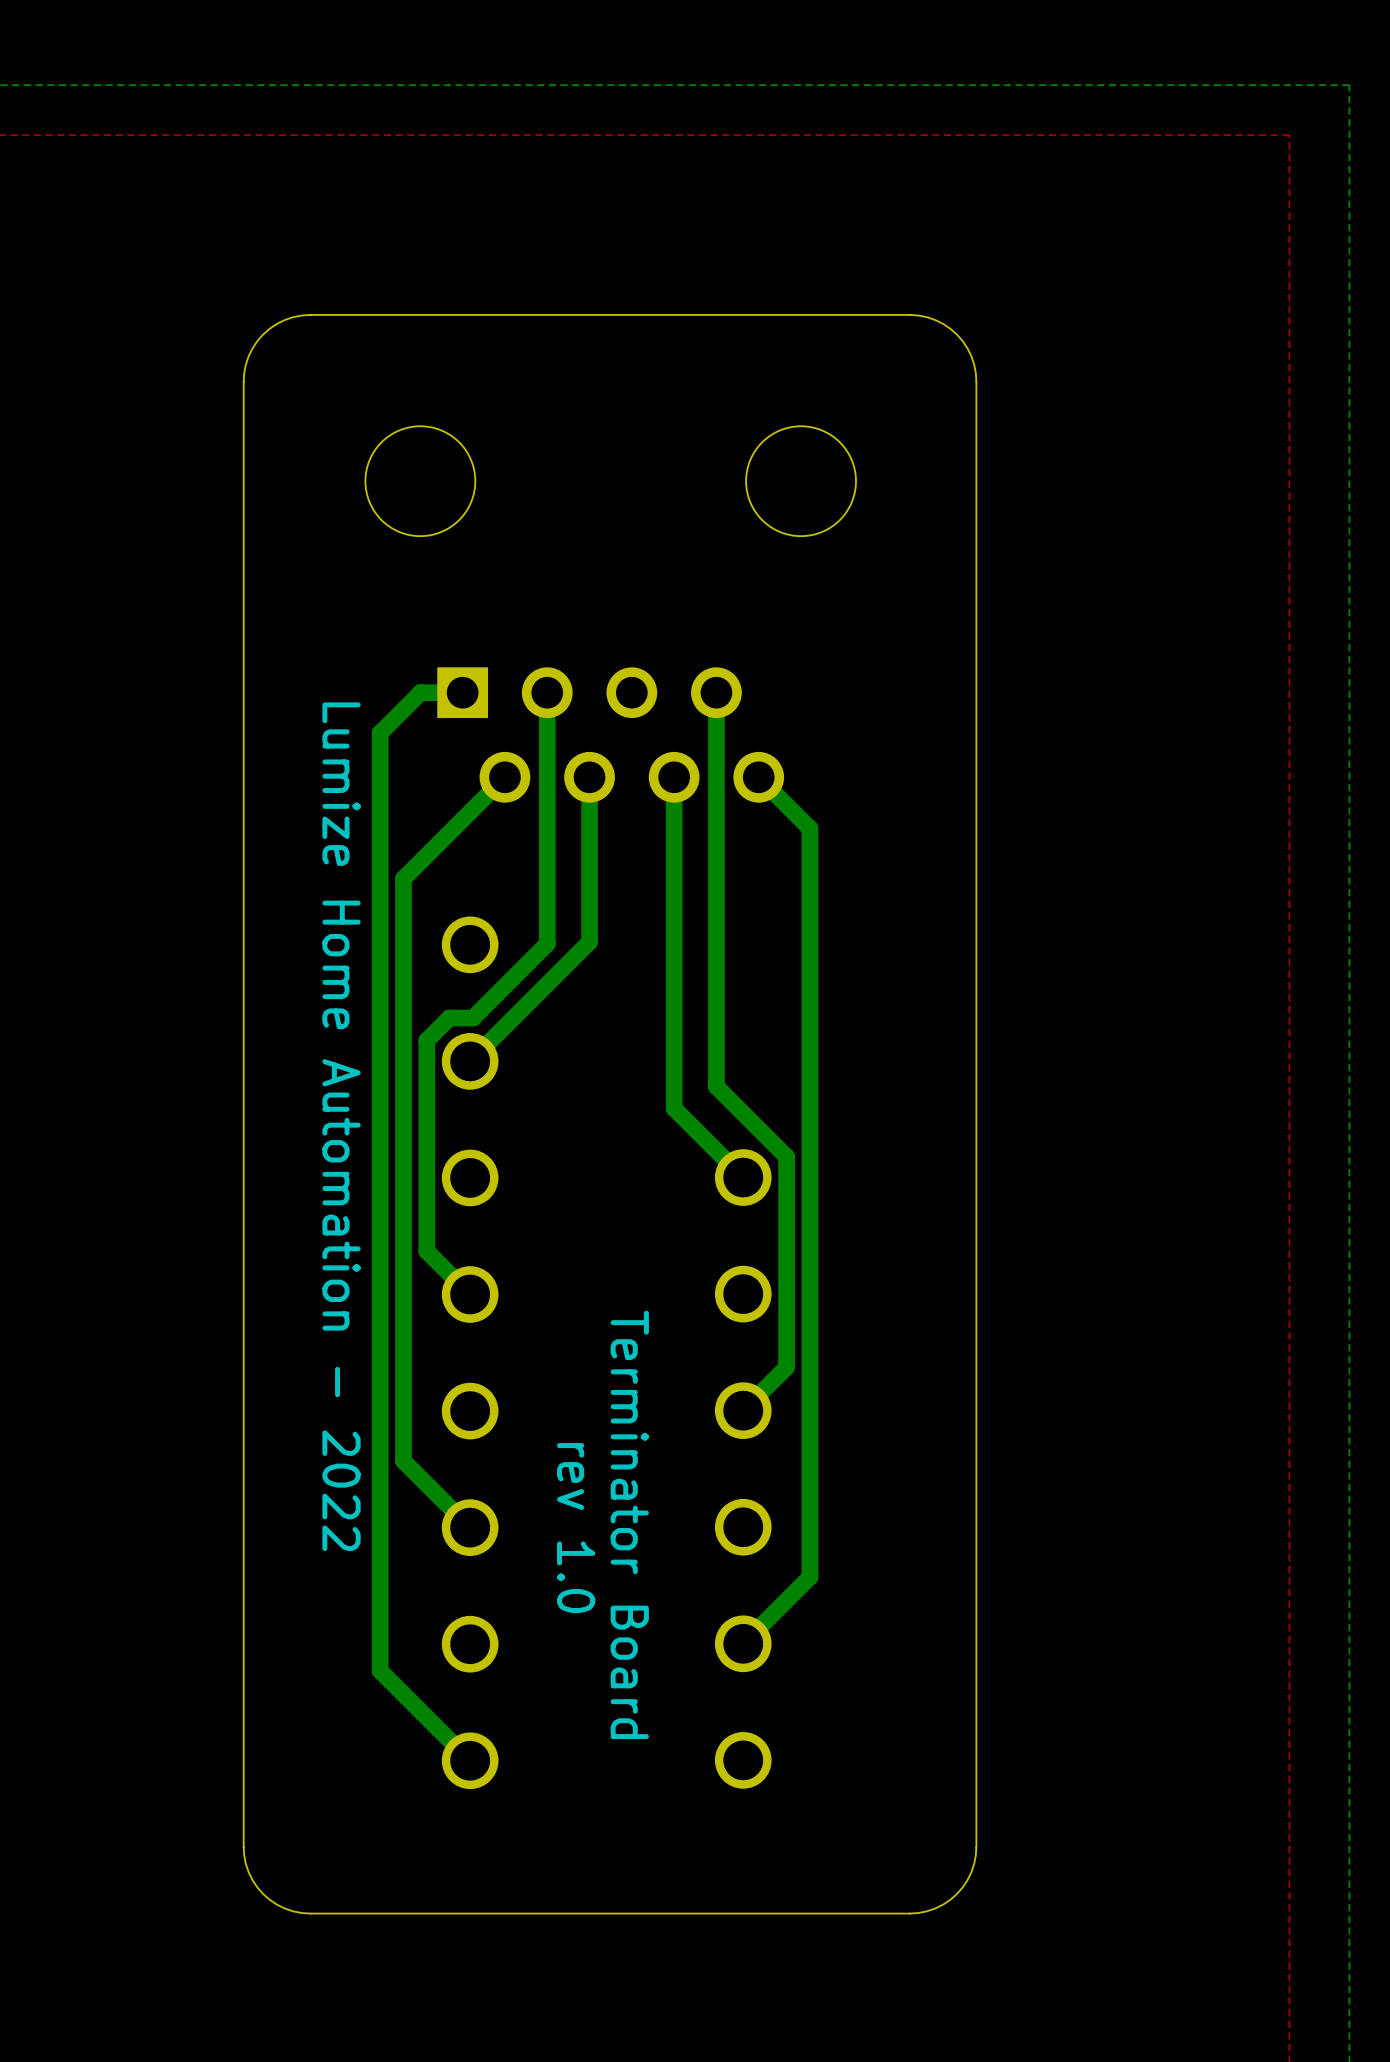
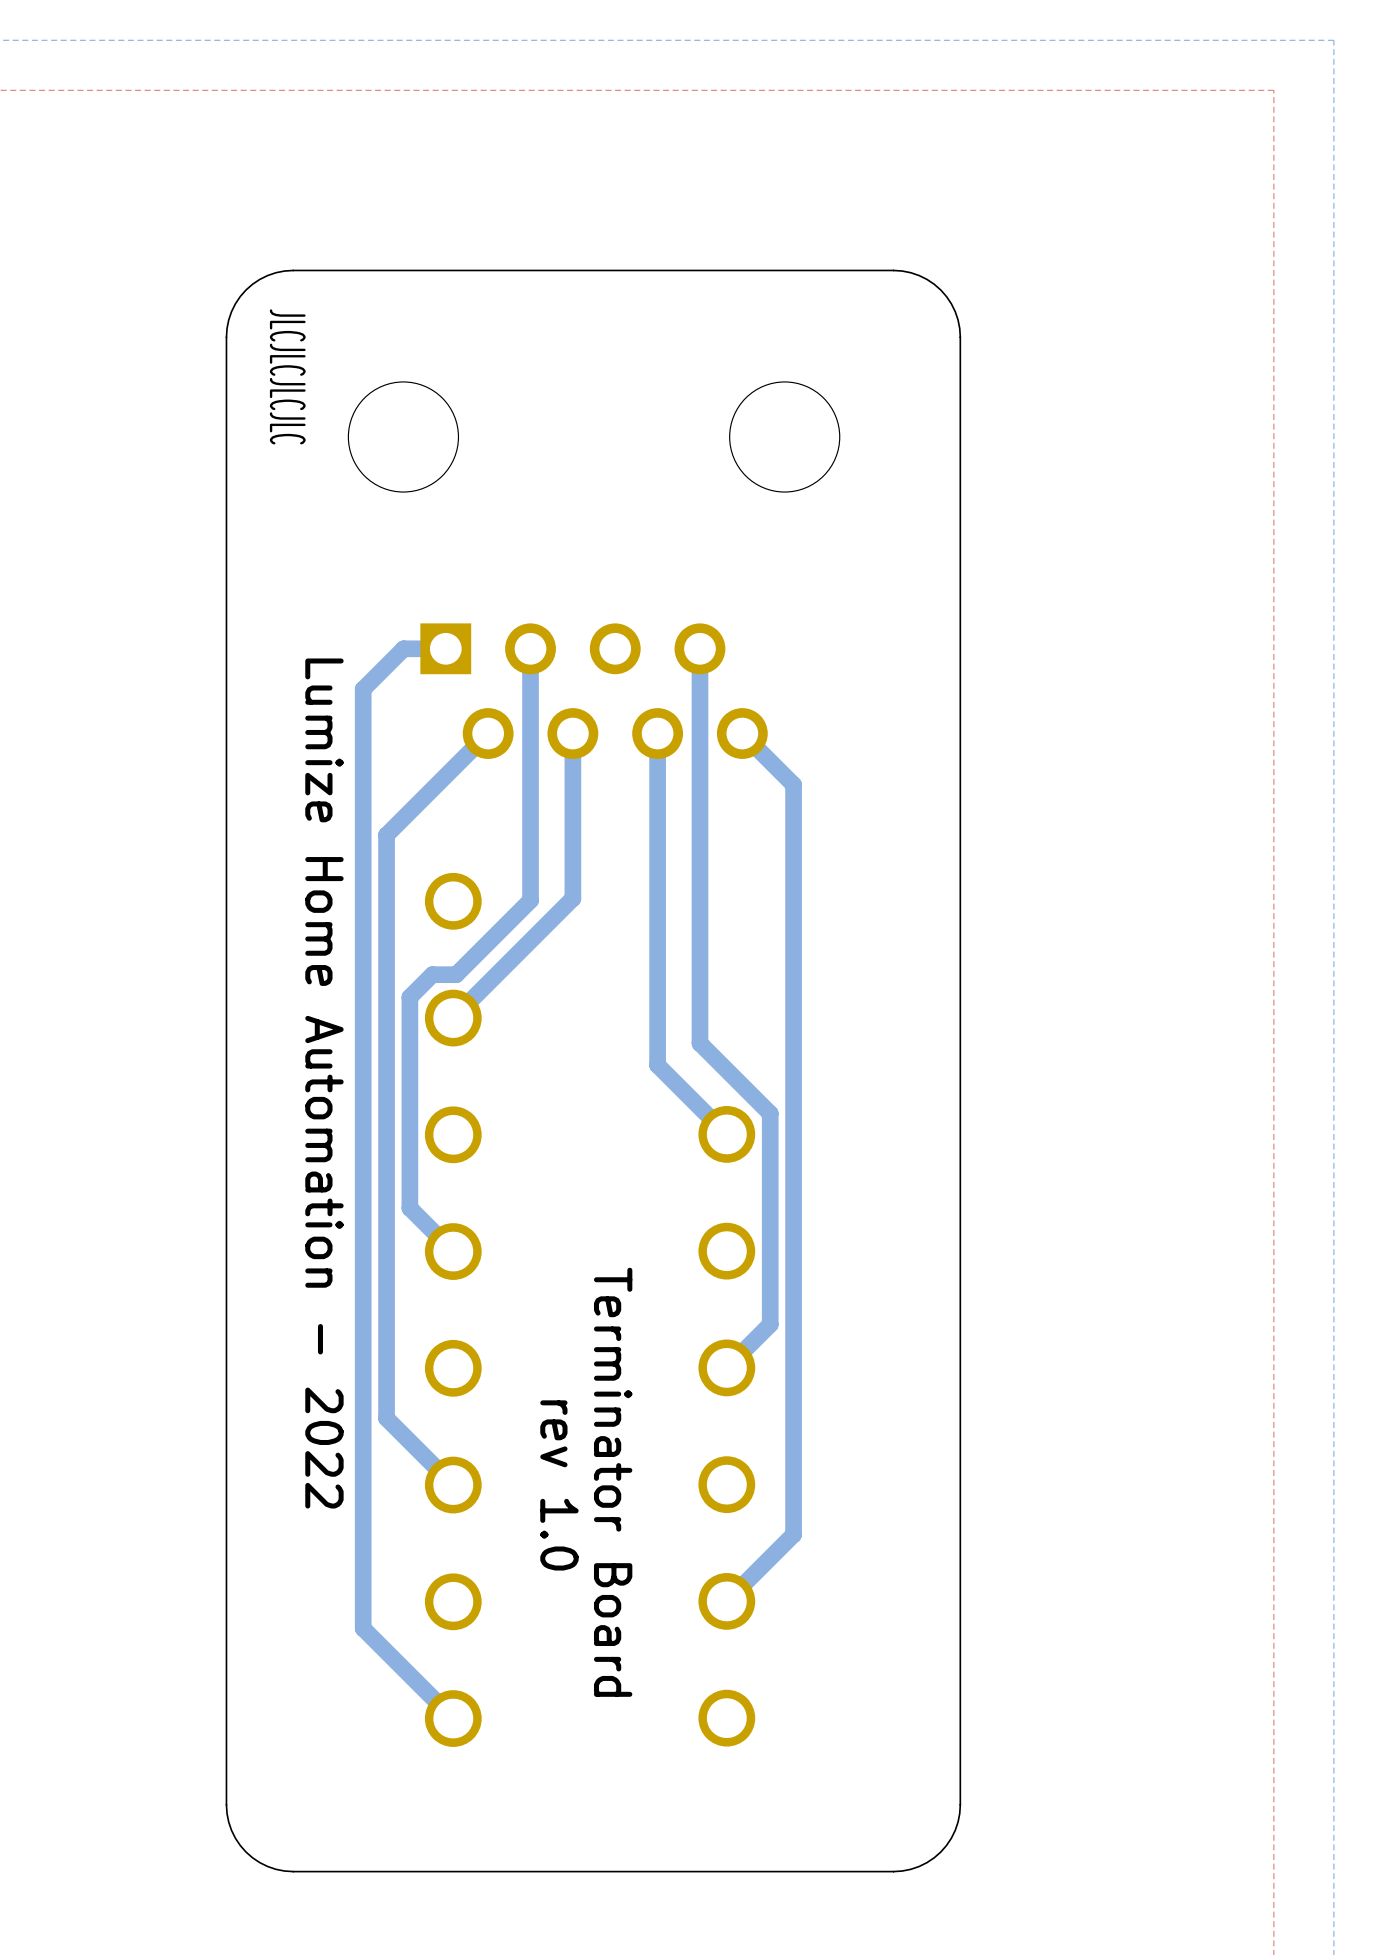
text: none -> JLCJLCJLCJLC (287, 376)

